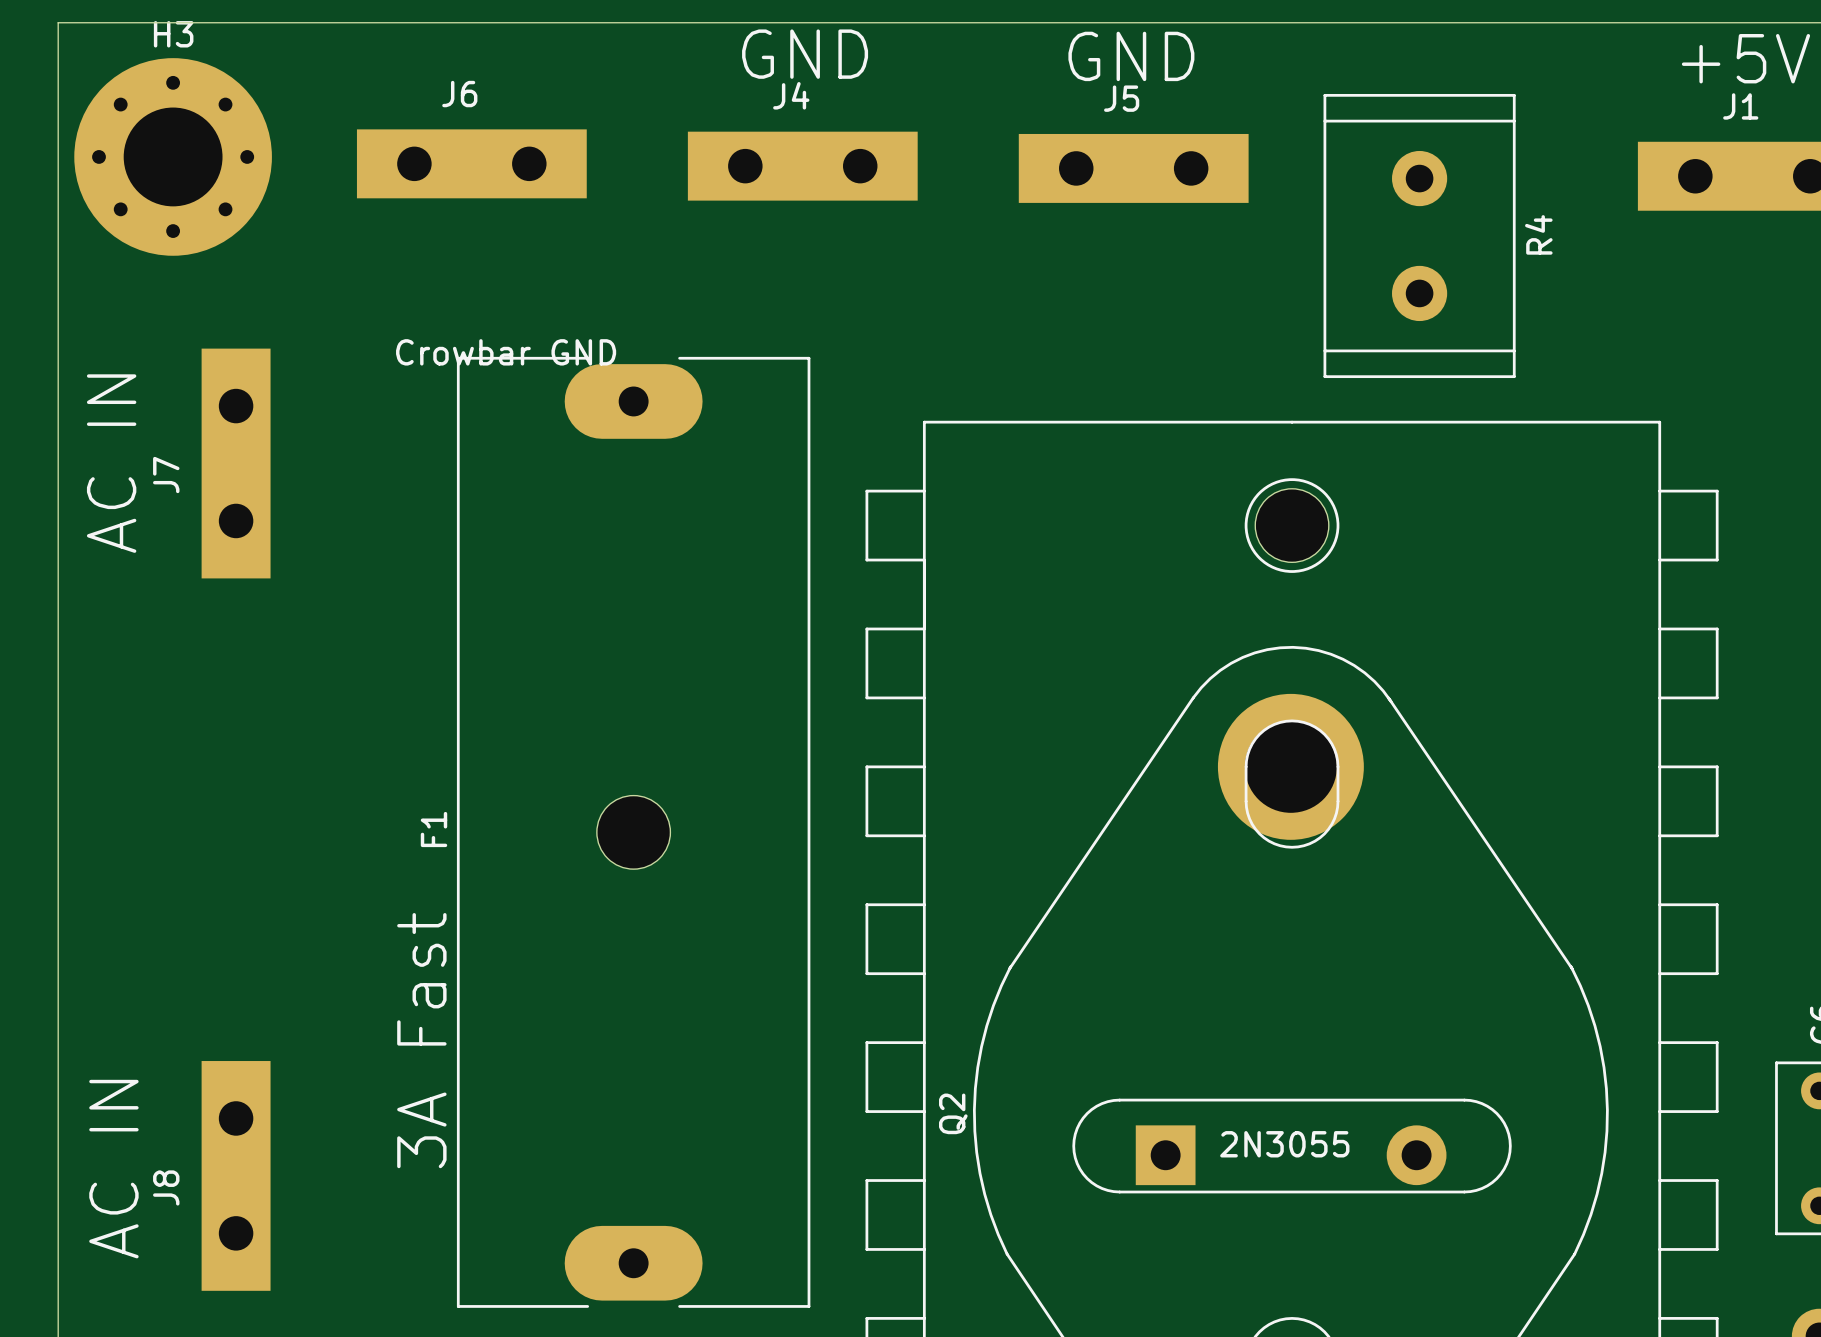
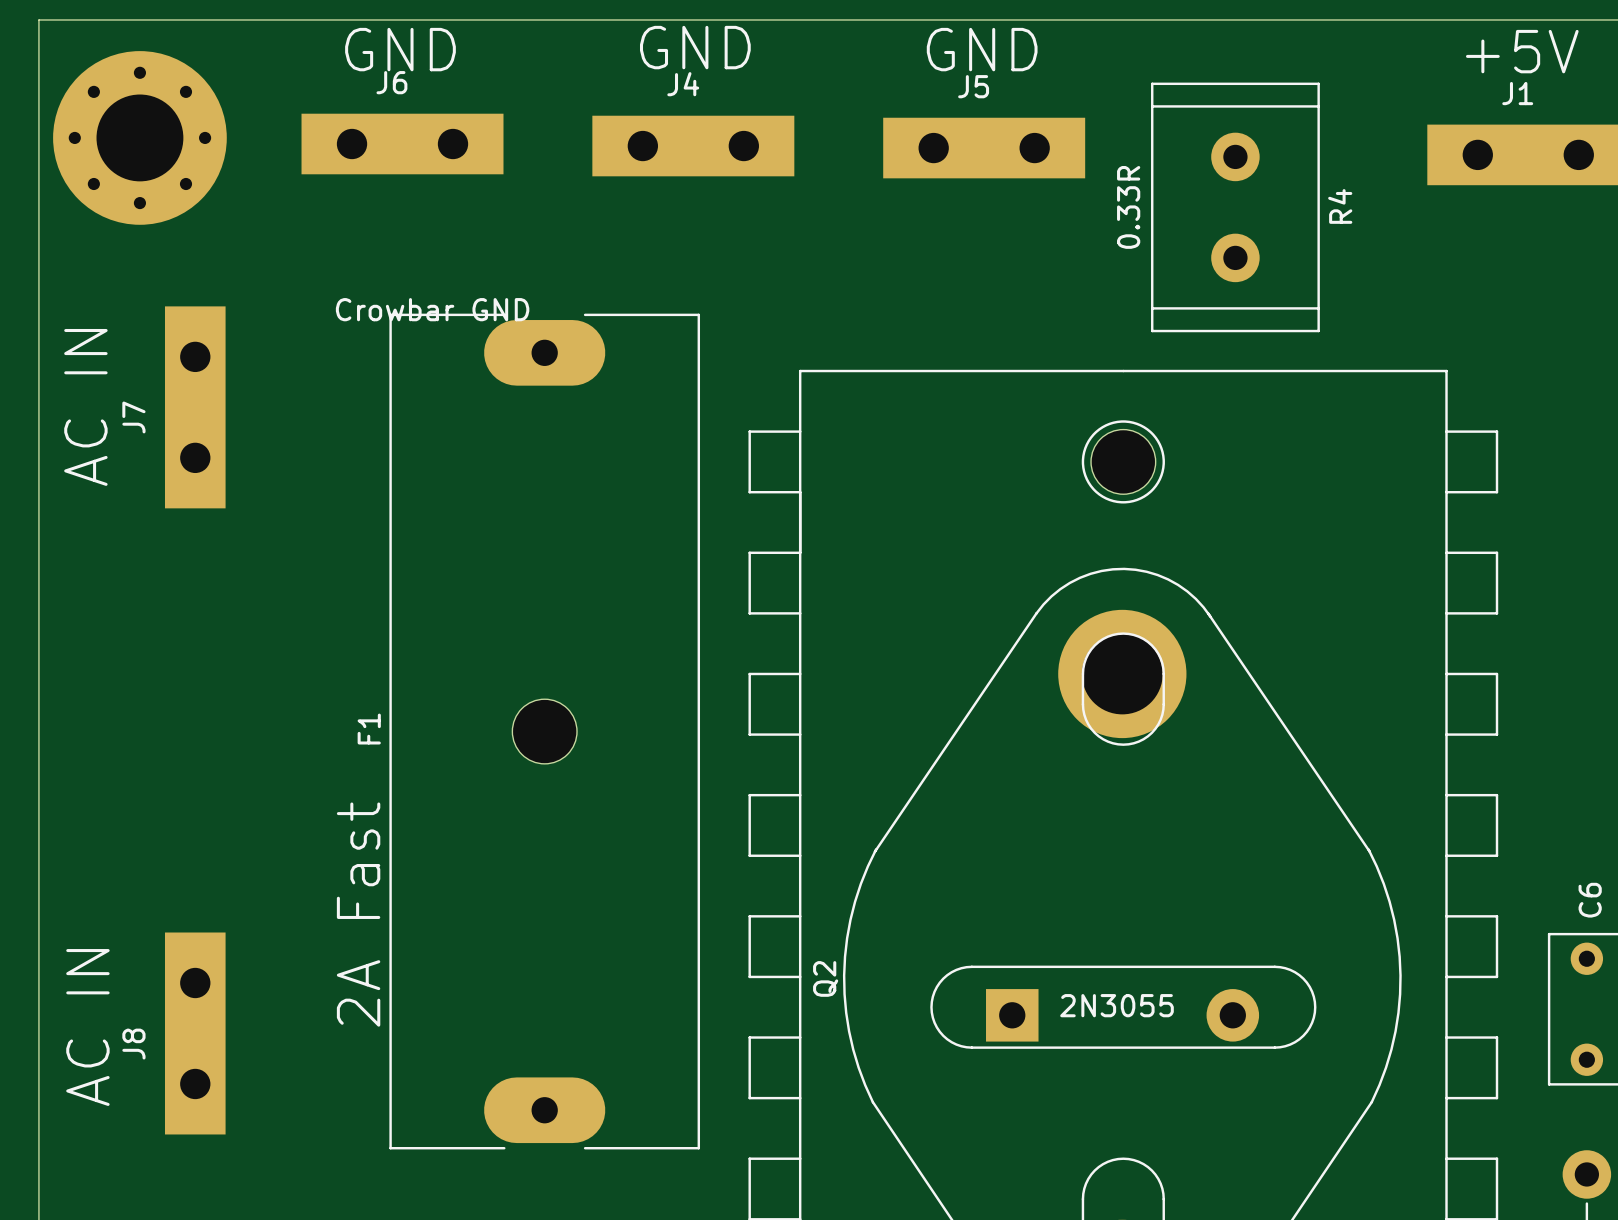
H3 name: H3 (173, 34) -> none
text: none -> GND (400, 49)
R4 value: none -> 0.33R (1128, 207)
text: 3A Fast (421, 1040) -> 2A Fast (358, 914)

